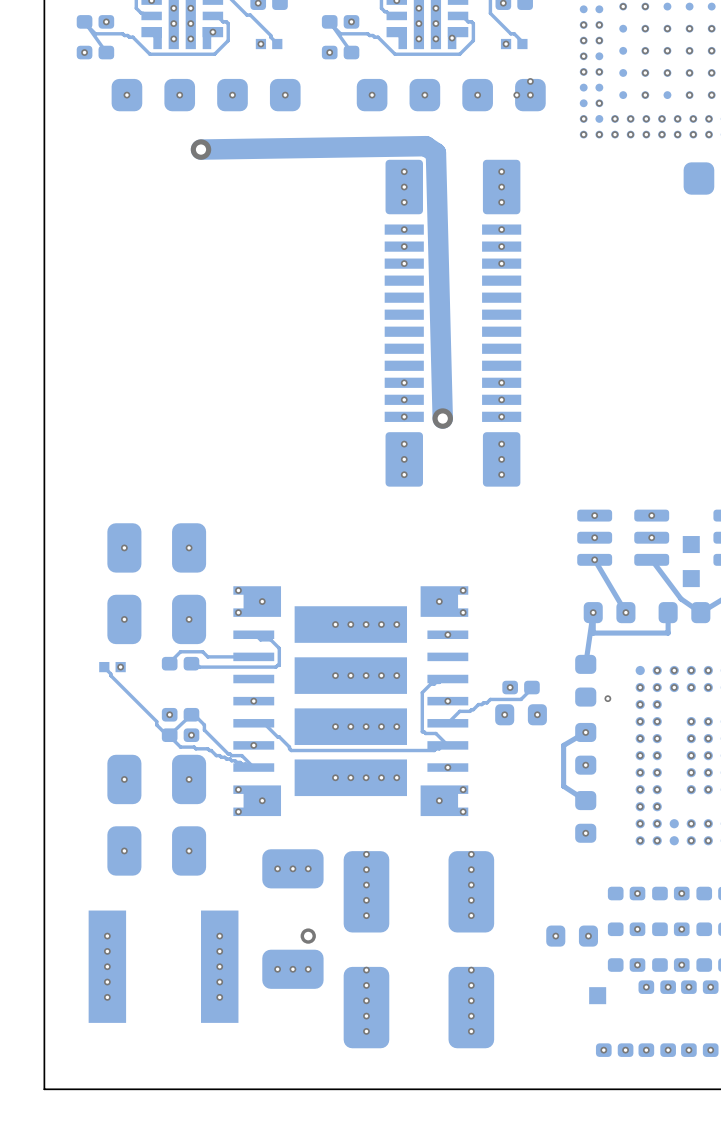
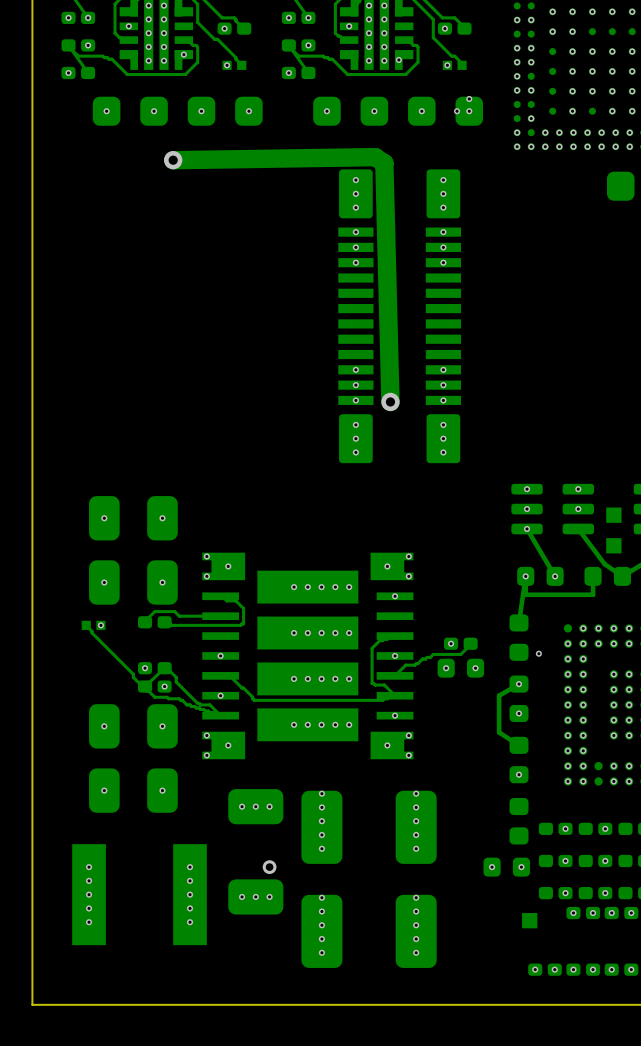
part: none -> (519, 821)

